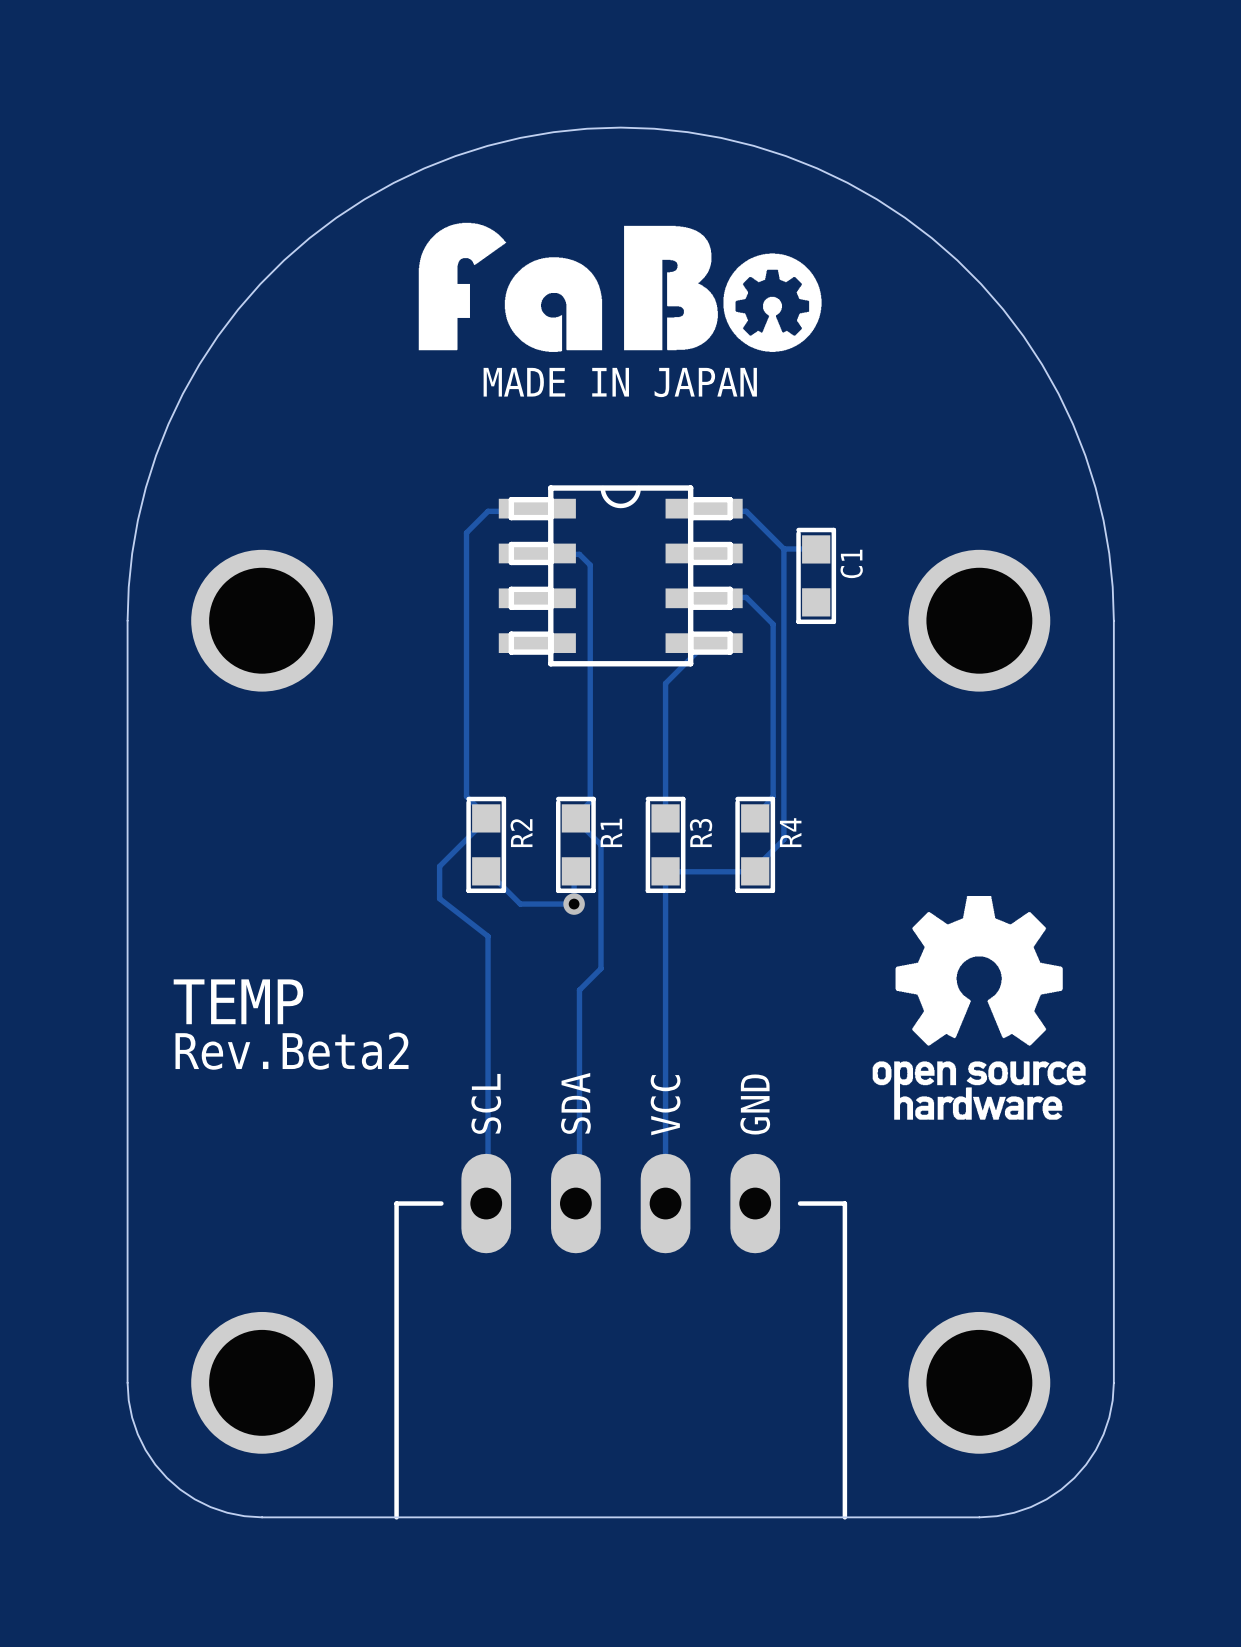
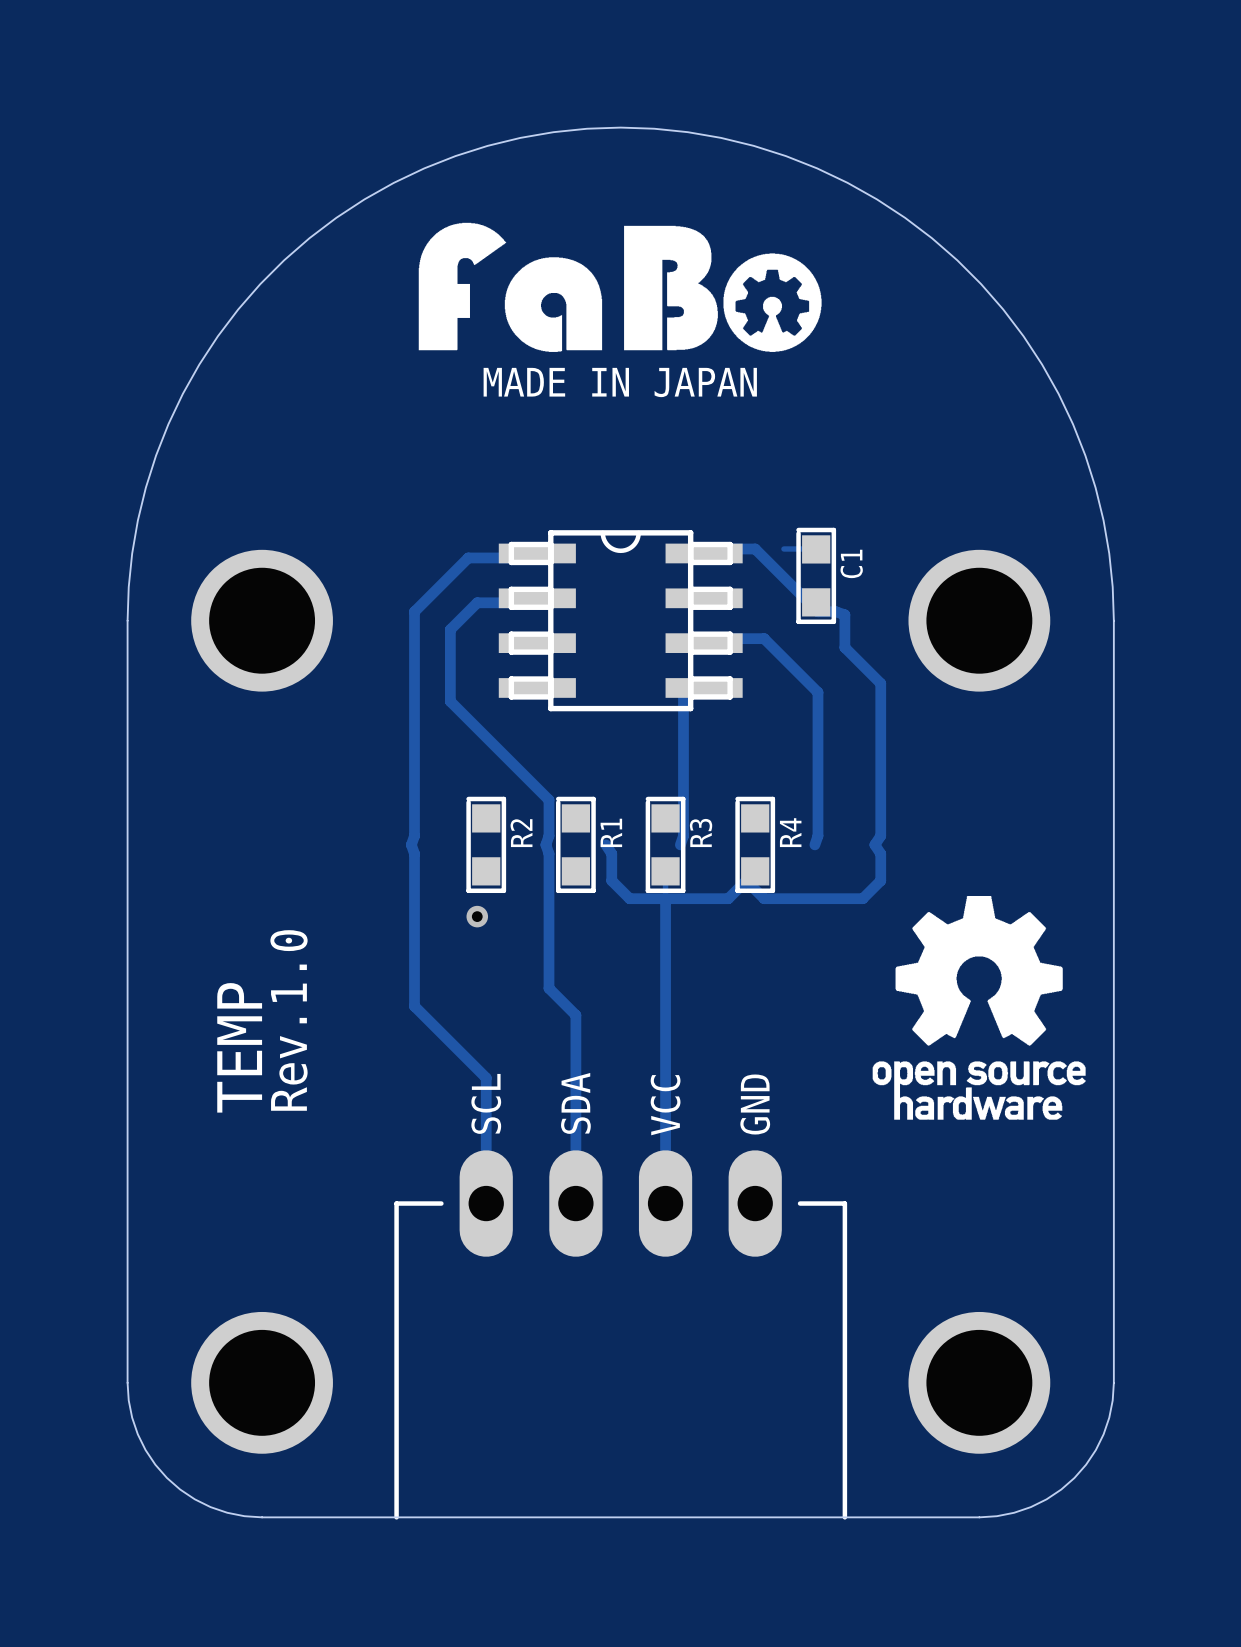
part footprint: [127, 127, 1114, 1520] -> [127, 127, 1114, 1520]
track: (537, 508) (536, 511) (488, 511) (466, 532) (466, 796) (488, 817) -> none
track: (704, 508) (708, 511) (746, 511) (783, 548) (783, 839) (757, 866) (755, 871) (665, 871) -> none
track: (537, 553) (579, 554) (590, 565) (590, 801) (575, 818) (601, 844) (601, 968) (579, 990) (579, 1199) (575, 1203) -> (537, 598) (531, 602) (477, 602) (450, 629) (450, 701) (548, 800) (548, 835) (545, 844) (548, 853) (548, 988) (575, 1015) (575, 1203)
track: none -> (704, 553) (710, 548) (755, 548) (817, 611) (835, 611) (844, 614) (844, 647) (880, 683) (880, 835) (874, 844) (880, 853) (880, 880) (862, 898) (764, 898) (746, 880) (728, 898) (629, 898) (611, 880) (611, 853) (605, 844)
part position: (620, 575) -> (620, 620)
track: (704, 598) (746, 597) (773, 624) (773, 796) (755, 818) -> none
track: (704, 643) (665, 683) (665, 818) -> (704, 643) (710, 638) (764, 638) (817, 692) (817, 835) (814, 844)
track: none -> (704, 687) (701, 692) (683, 692) (683, 835) (680, 844)
track: (488, 817) (439, 866) (439, 898) (488, 936) (488, 1199) (486, 1203) -> (537, 553) (531, 557) (468, 557) (414, 611) (414, 835) (411, 844) (414, 853) (414, 1006) (486, 1078) (486, 1203)
track: (486, 871) (482, 866) (520, 904) (574, 904) (574, 871) (575, 871) -> none
track width: thin (665, 898) (665, 1203) -> thick (665, 898) (665, 1203)
via position: (574, 904) -> (477, 916)
text rotation: 0° (238, 1001) -> 90° counterclockwise (239, 1047)
text: none -> Rev.1.0 (289, 1020)
text: Rev.Beta2 (292, 1051) -> none

